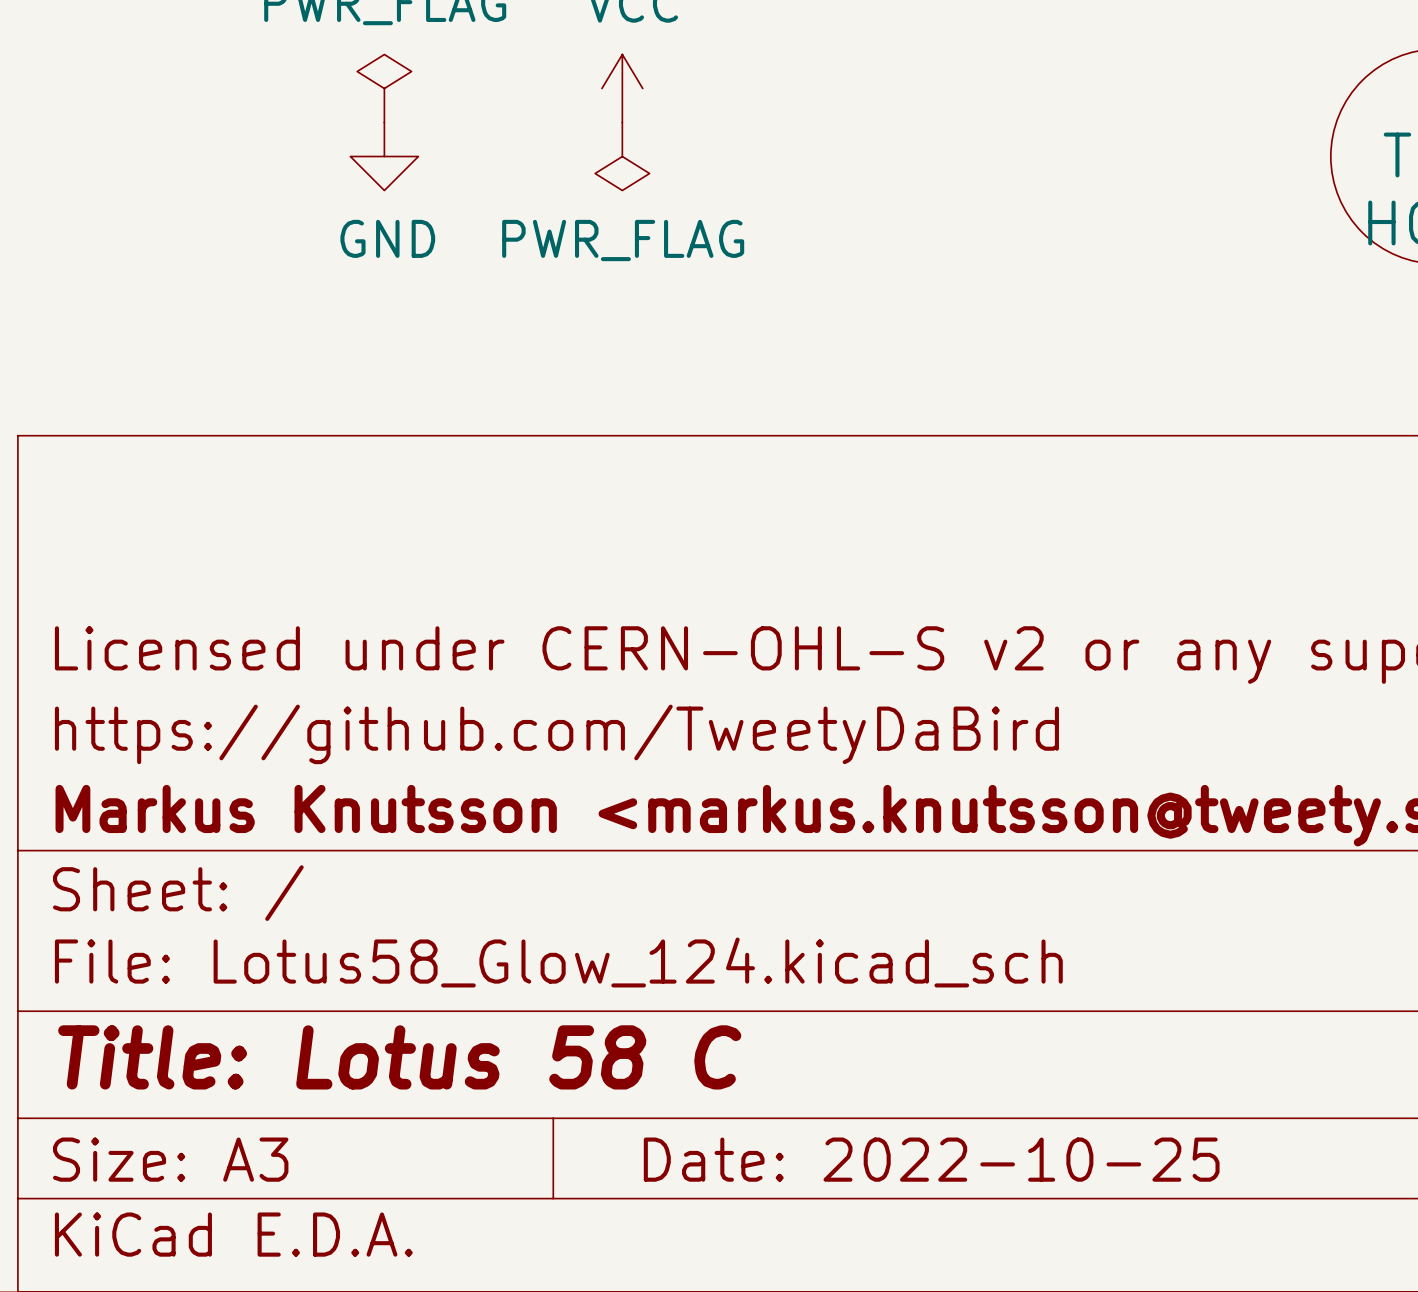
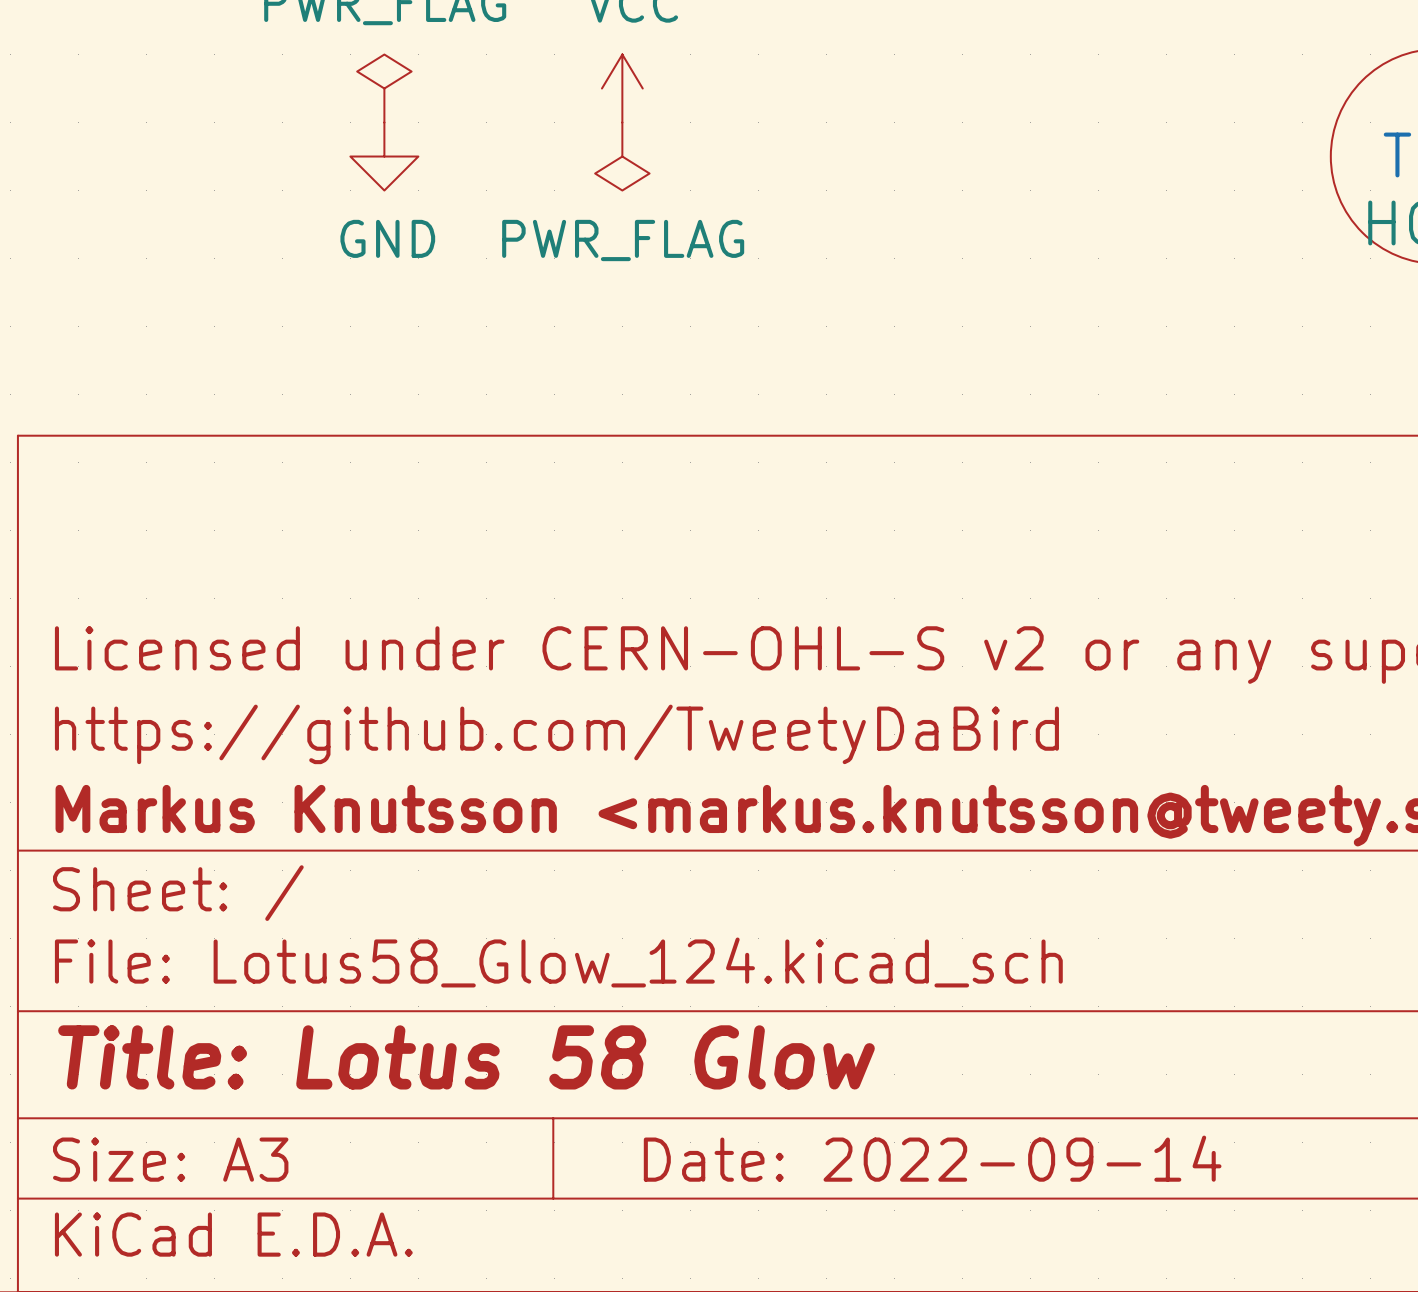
title block: Title: Lotus 58 C (399, 1057) -> Title: Lotus 58 Glow (466, 1057)
title block: Date: 2022-10-25 (931, 1159) -> Date: 2022-09-14 (932, 1158)

